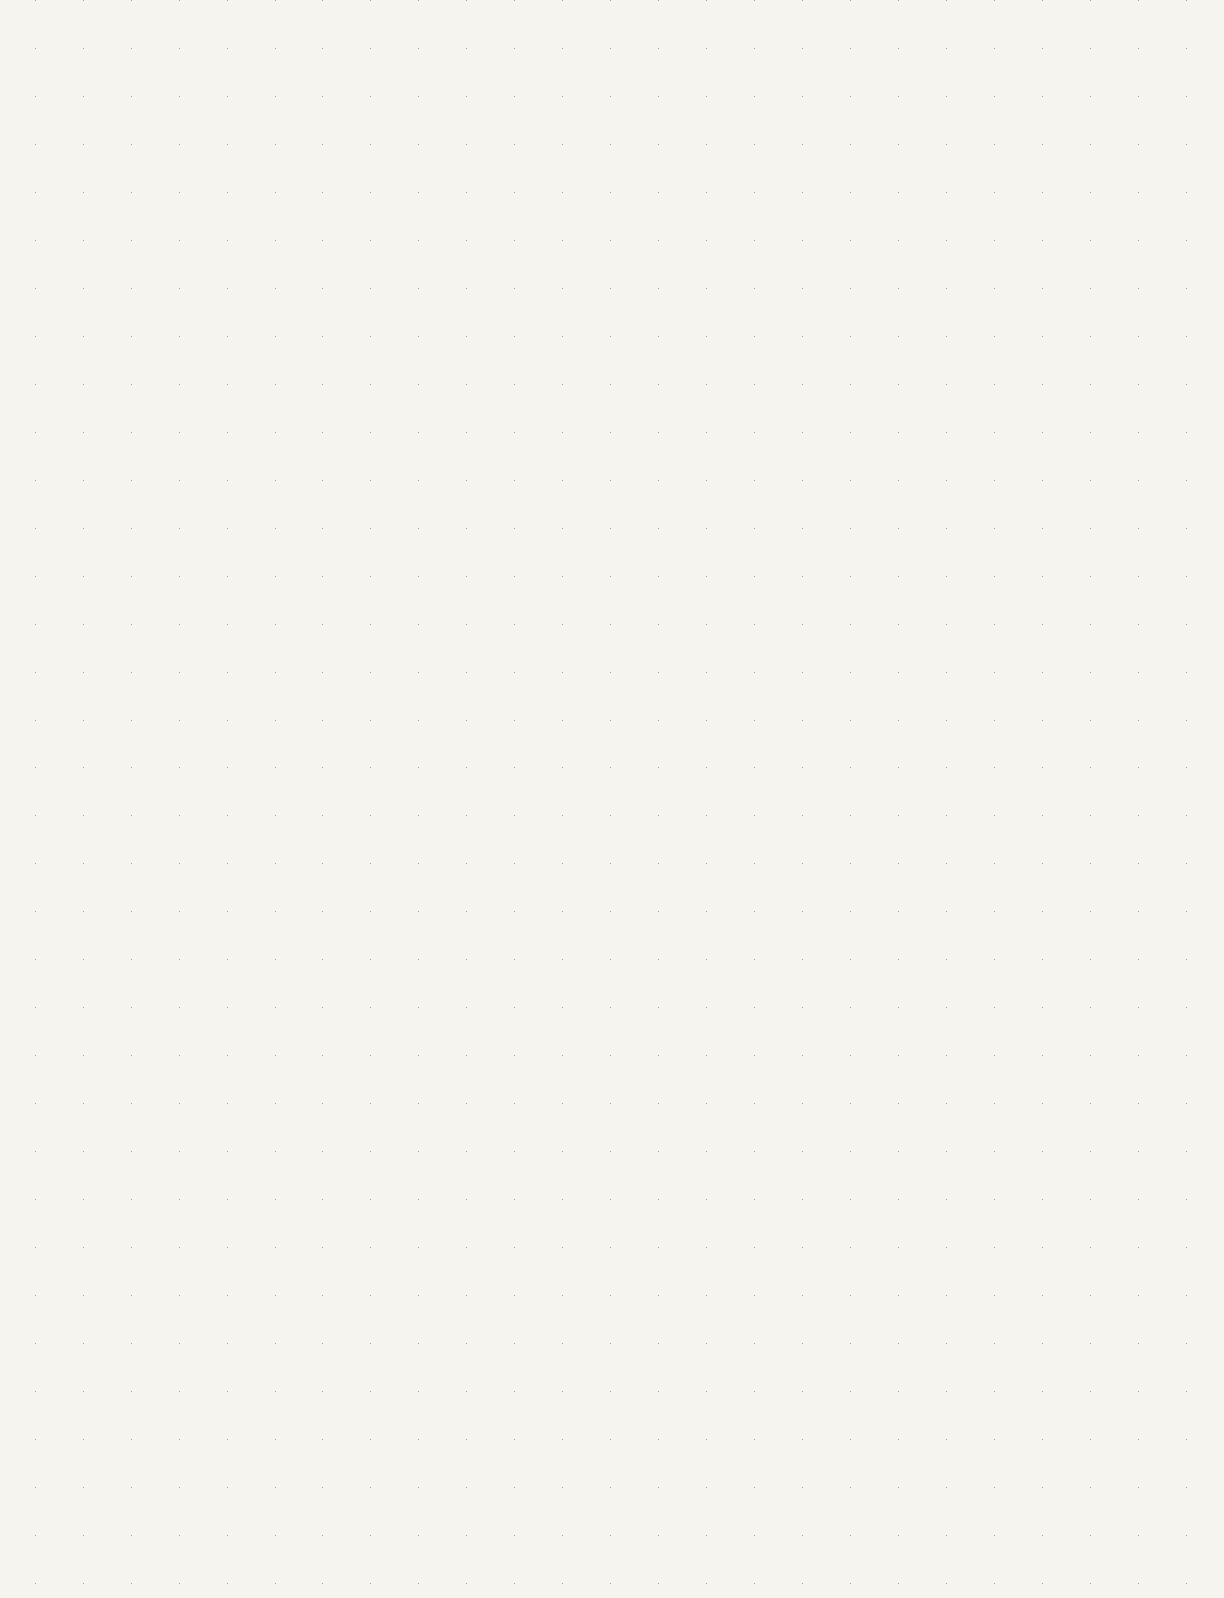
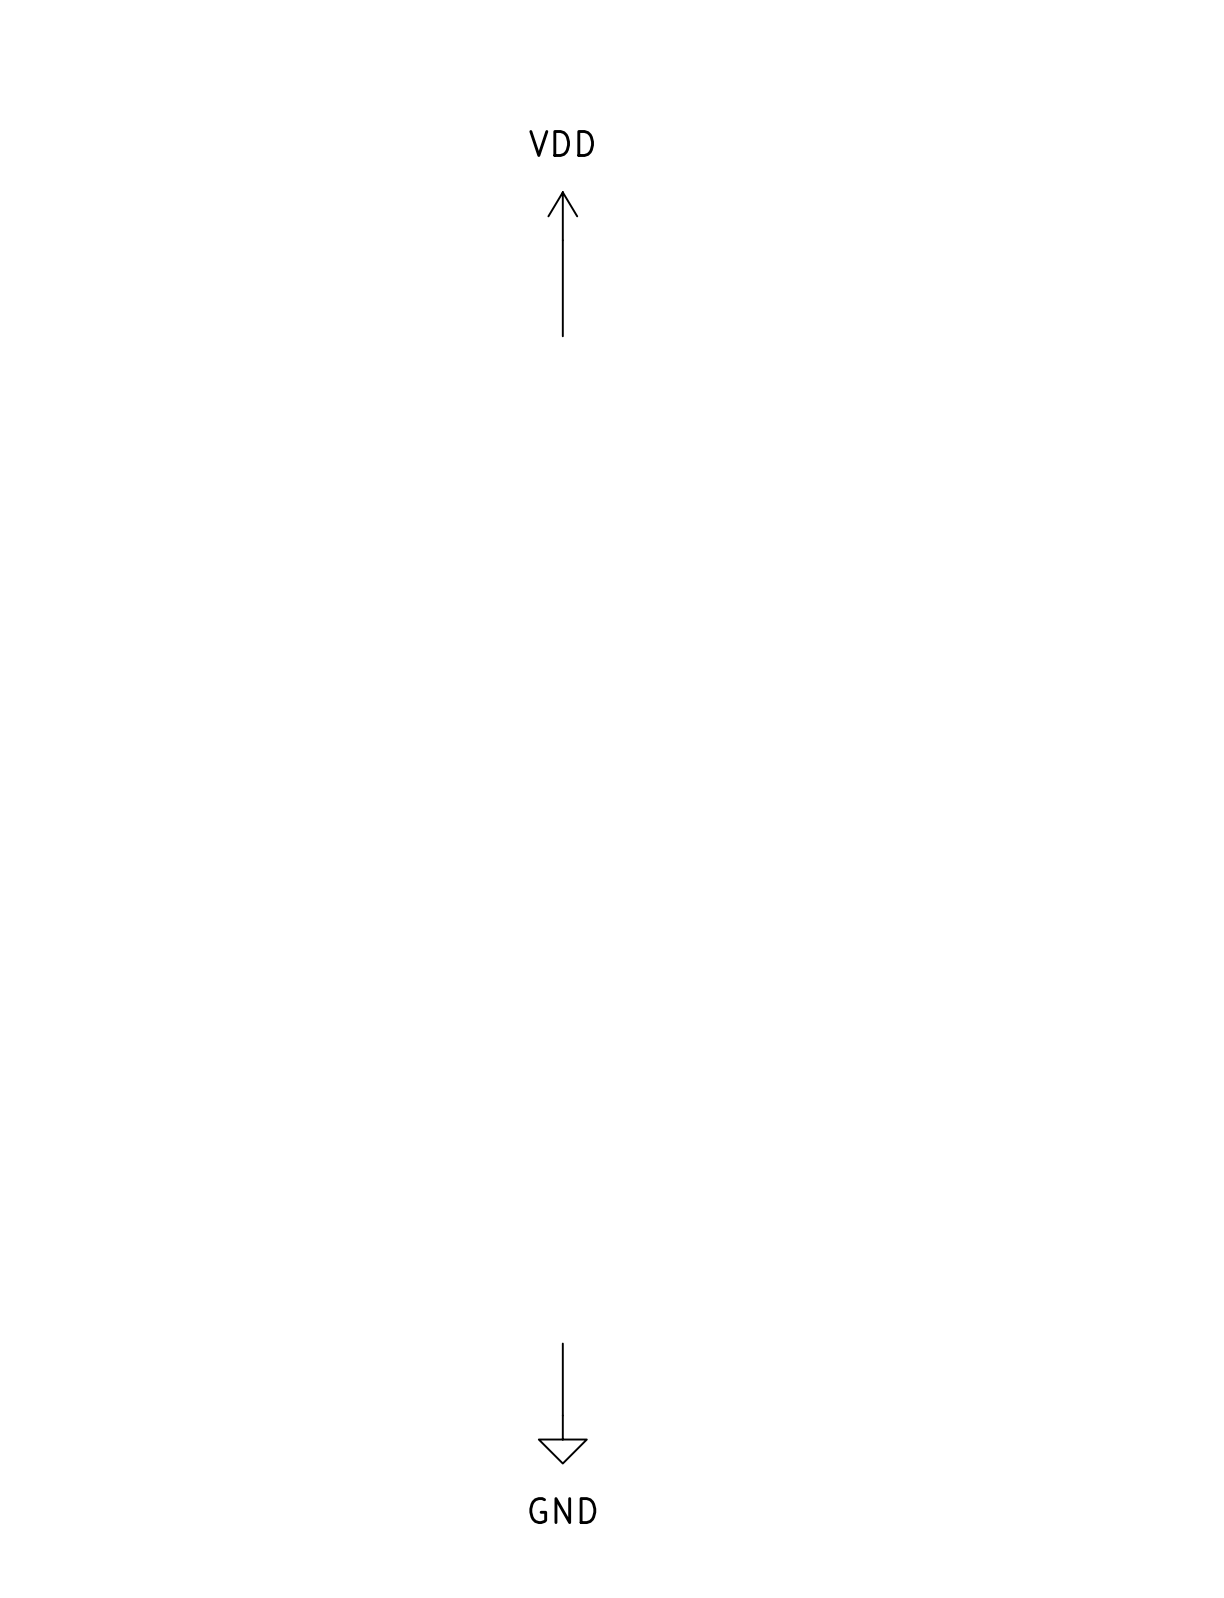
power symbol: none -> VDD (562, 216)
wire: none -> (562, 240) (562, 336)
wire: none -> (562, 1343) (562, 1415)
power symbol: none -> GND (562, 1439)

